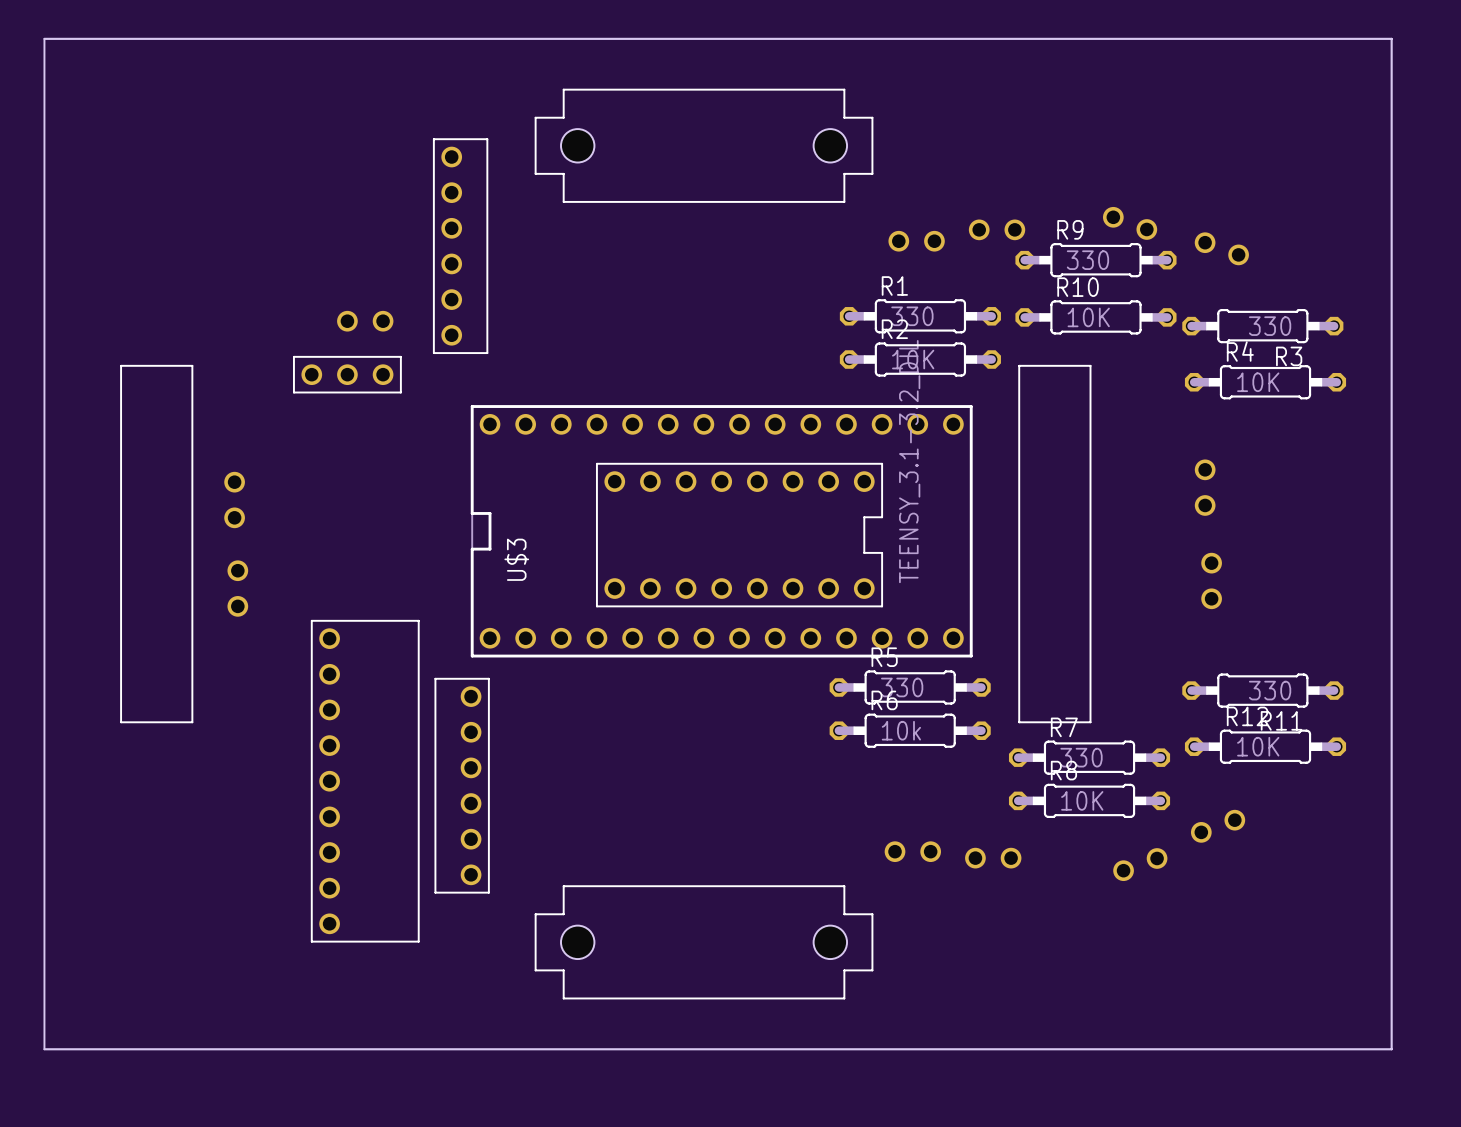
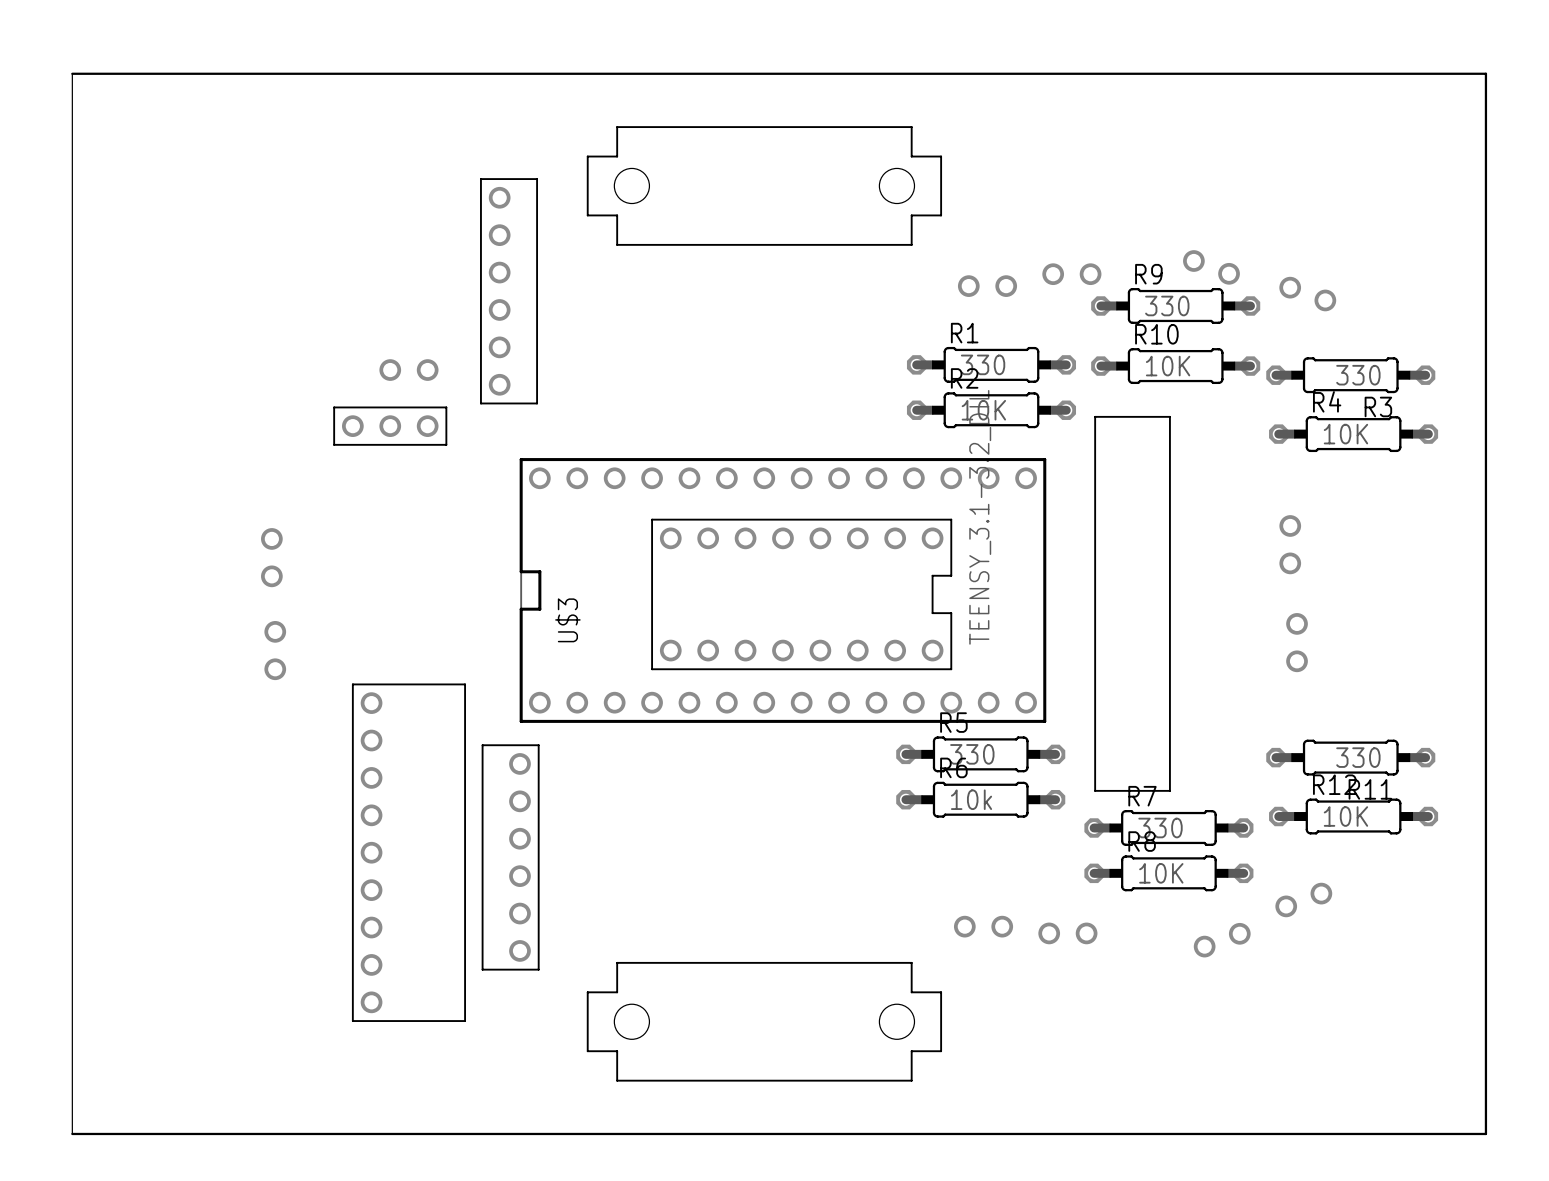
drawing: [120, 364, 194, 724] -> none

